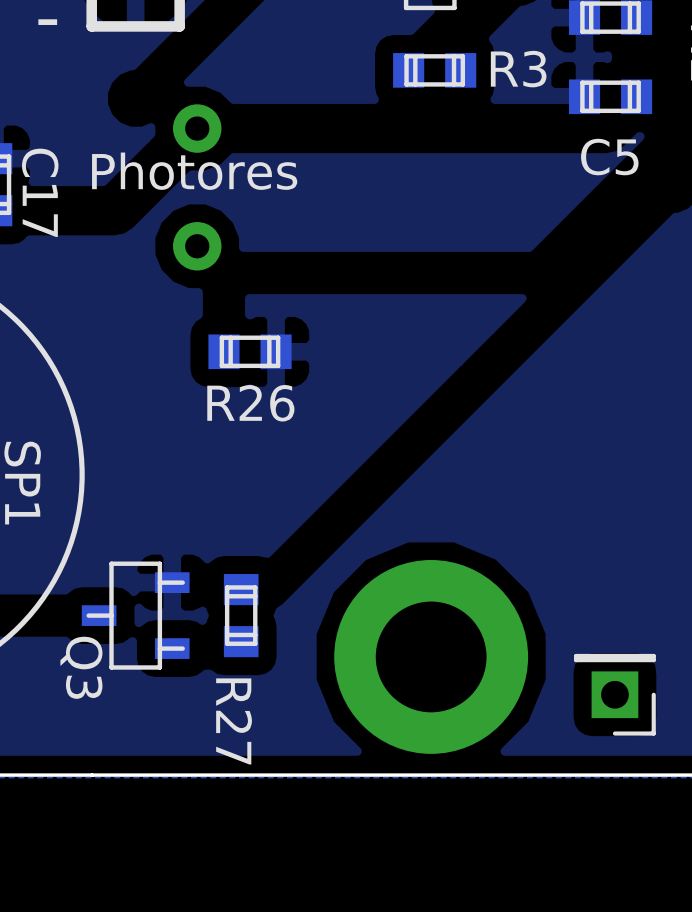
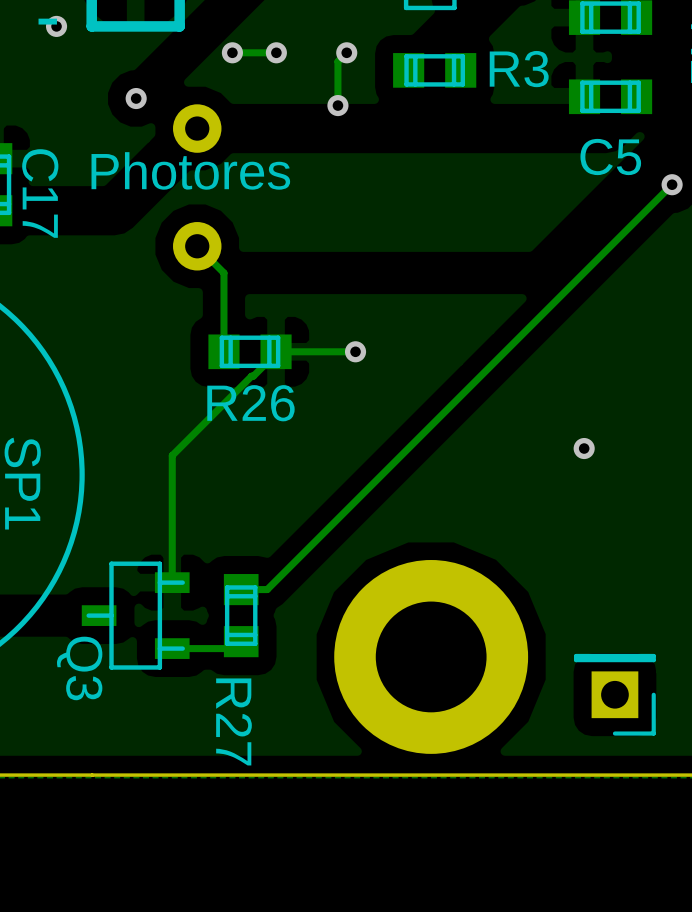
via: none -> (56, 26)
via: none -> (232, 52)
track: none -> (276, 52) (232, 52)
via: none -> (276, 52)
track: none -> (346, 52) (337, 61) (337, 105)
via: none -> (346, 52)
via: none -> (136, 98)
via: none -> (337, 105)
track: none -> (672, 184) (267, 589) (241, 589)
via: none -> (672, 184)
track: none -> (197, 246) (223, 273) (223, 351)
track: none -> (355, 351) (276, 351) (172, 455) (172, 582)
via: none -> (355, 351)
via: none -> (584, 448)
track: none -> (241, 641) (234, 648) (172, 648)

